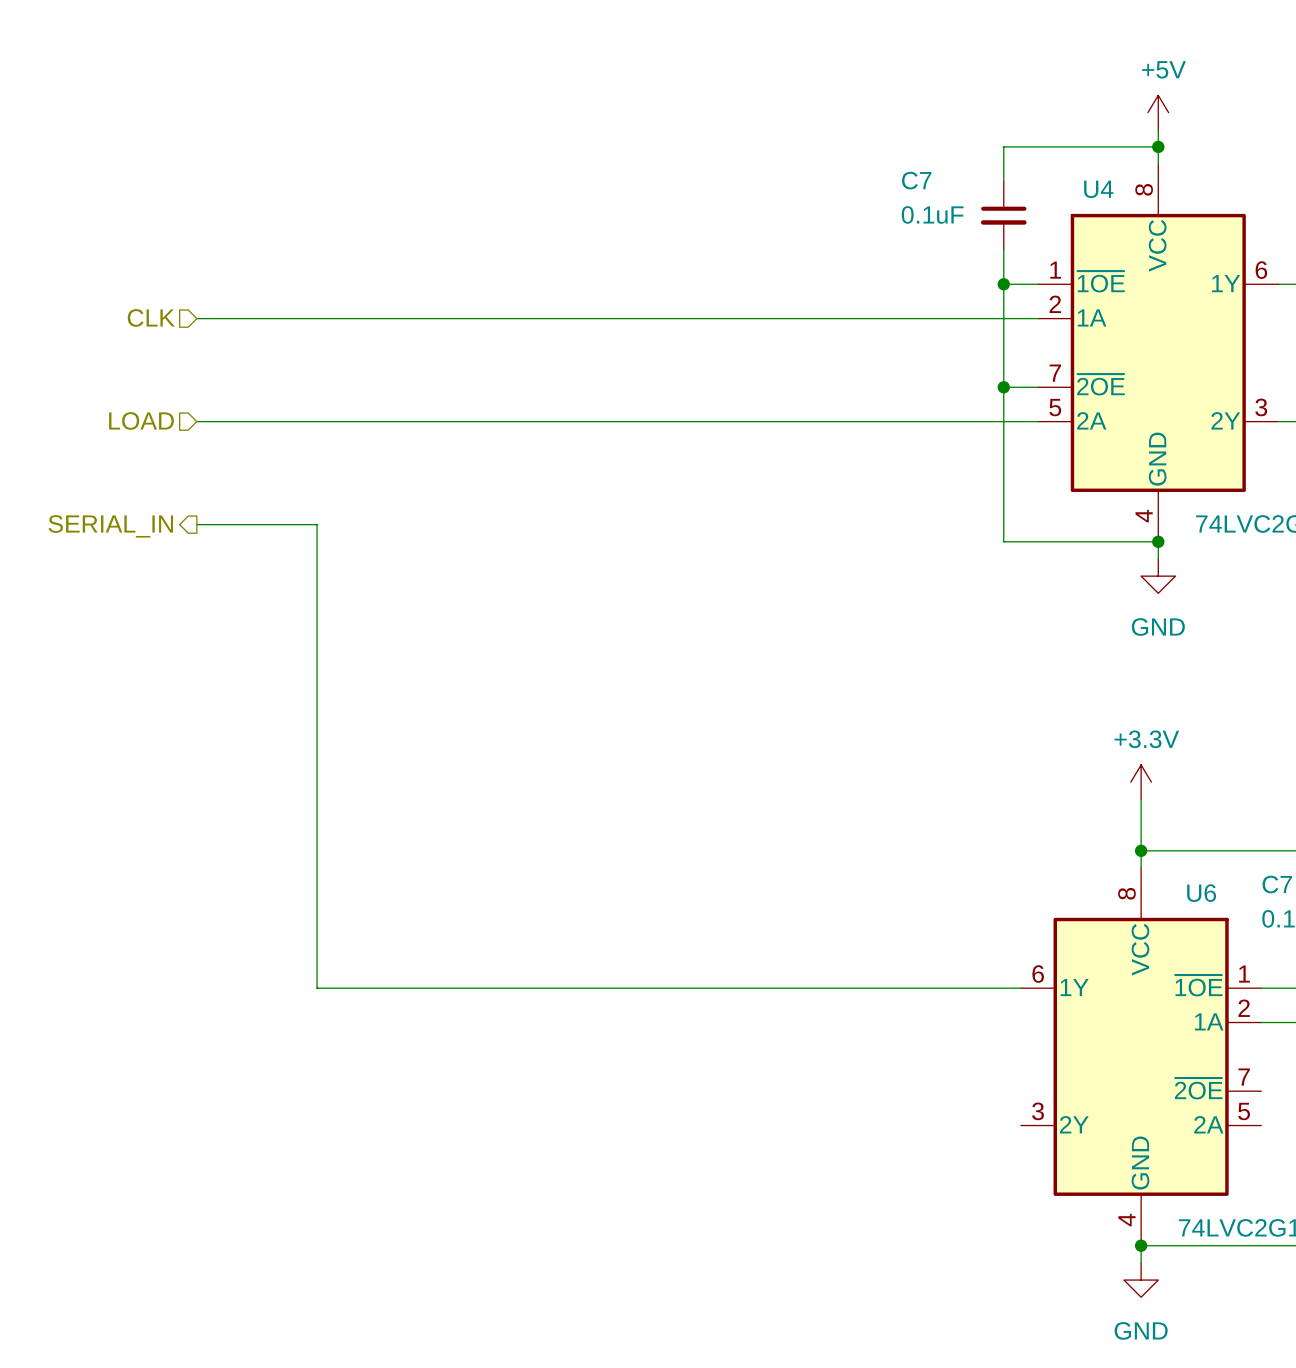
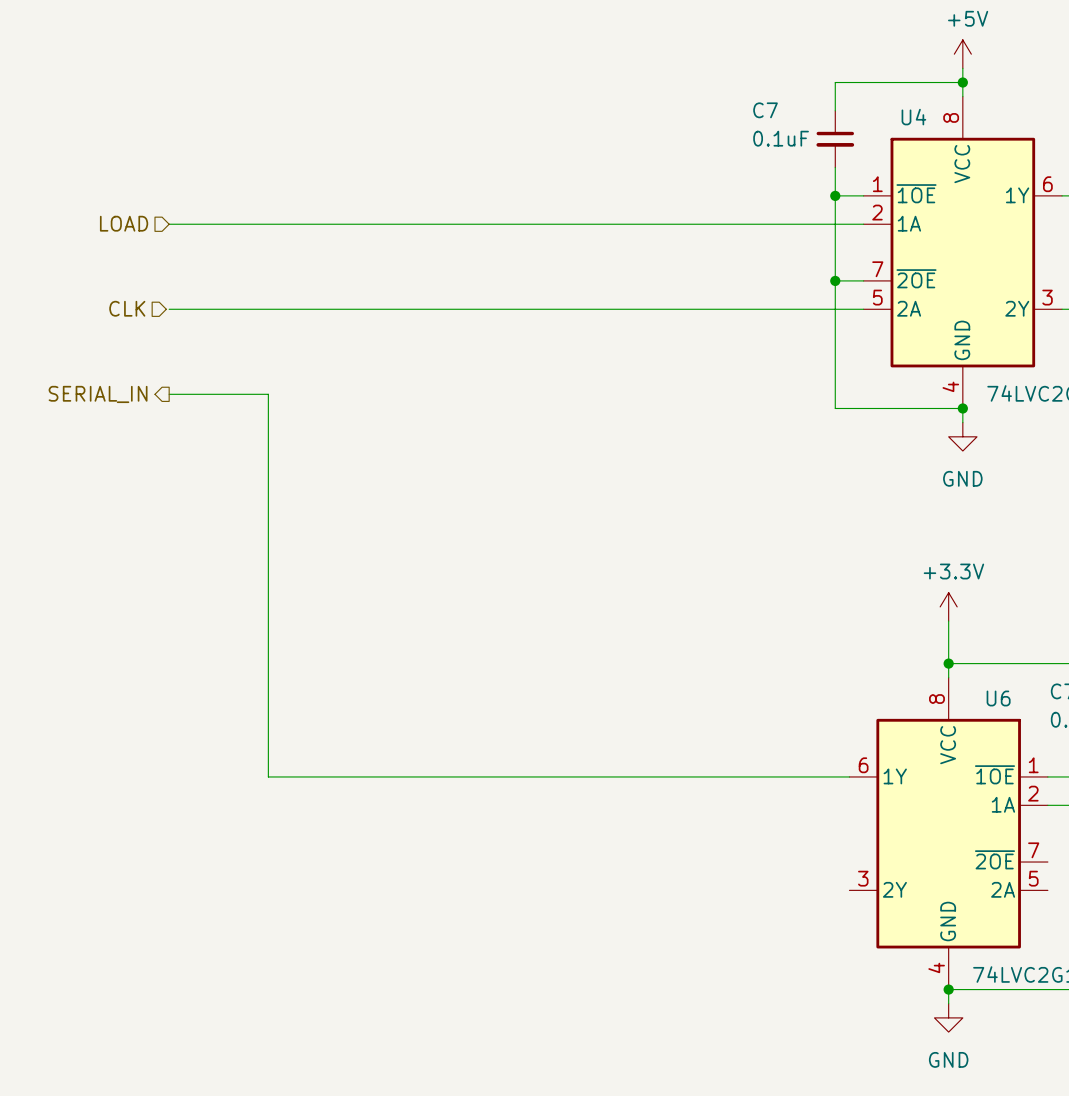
hierarchical label: CLK (151, 317) -> LOAD (124, 223)
hierarchical label: LOAD (141, 420) -> CLK (127, 308)

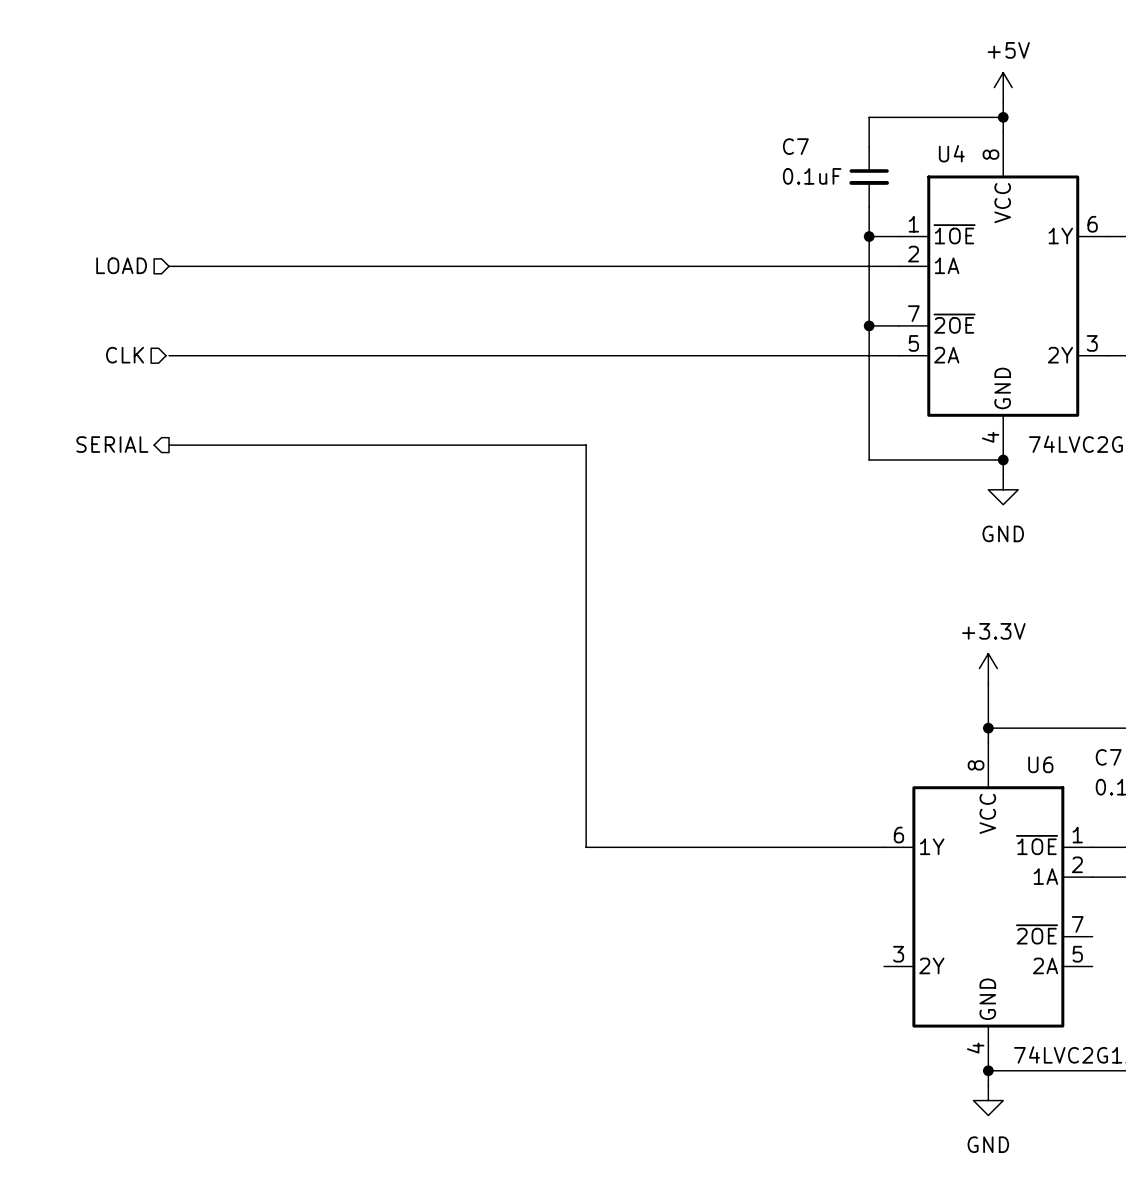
hierarchical label: SERIAL_IN (98, 394) -> SERIAL (112, 444)
wire: (268, 394) (268, 776) (566, 776) -> (273, 445) (586, 445) (586, 847)

